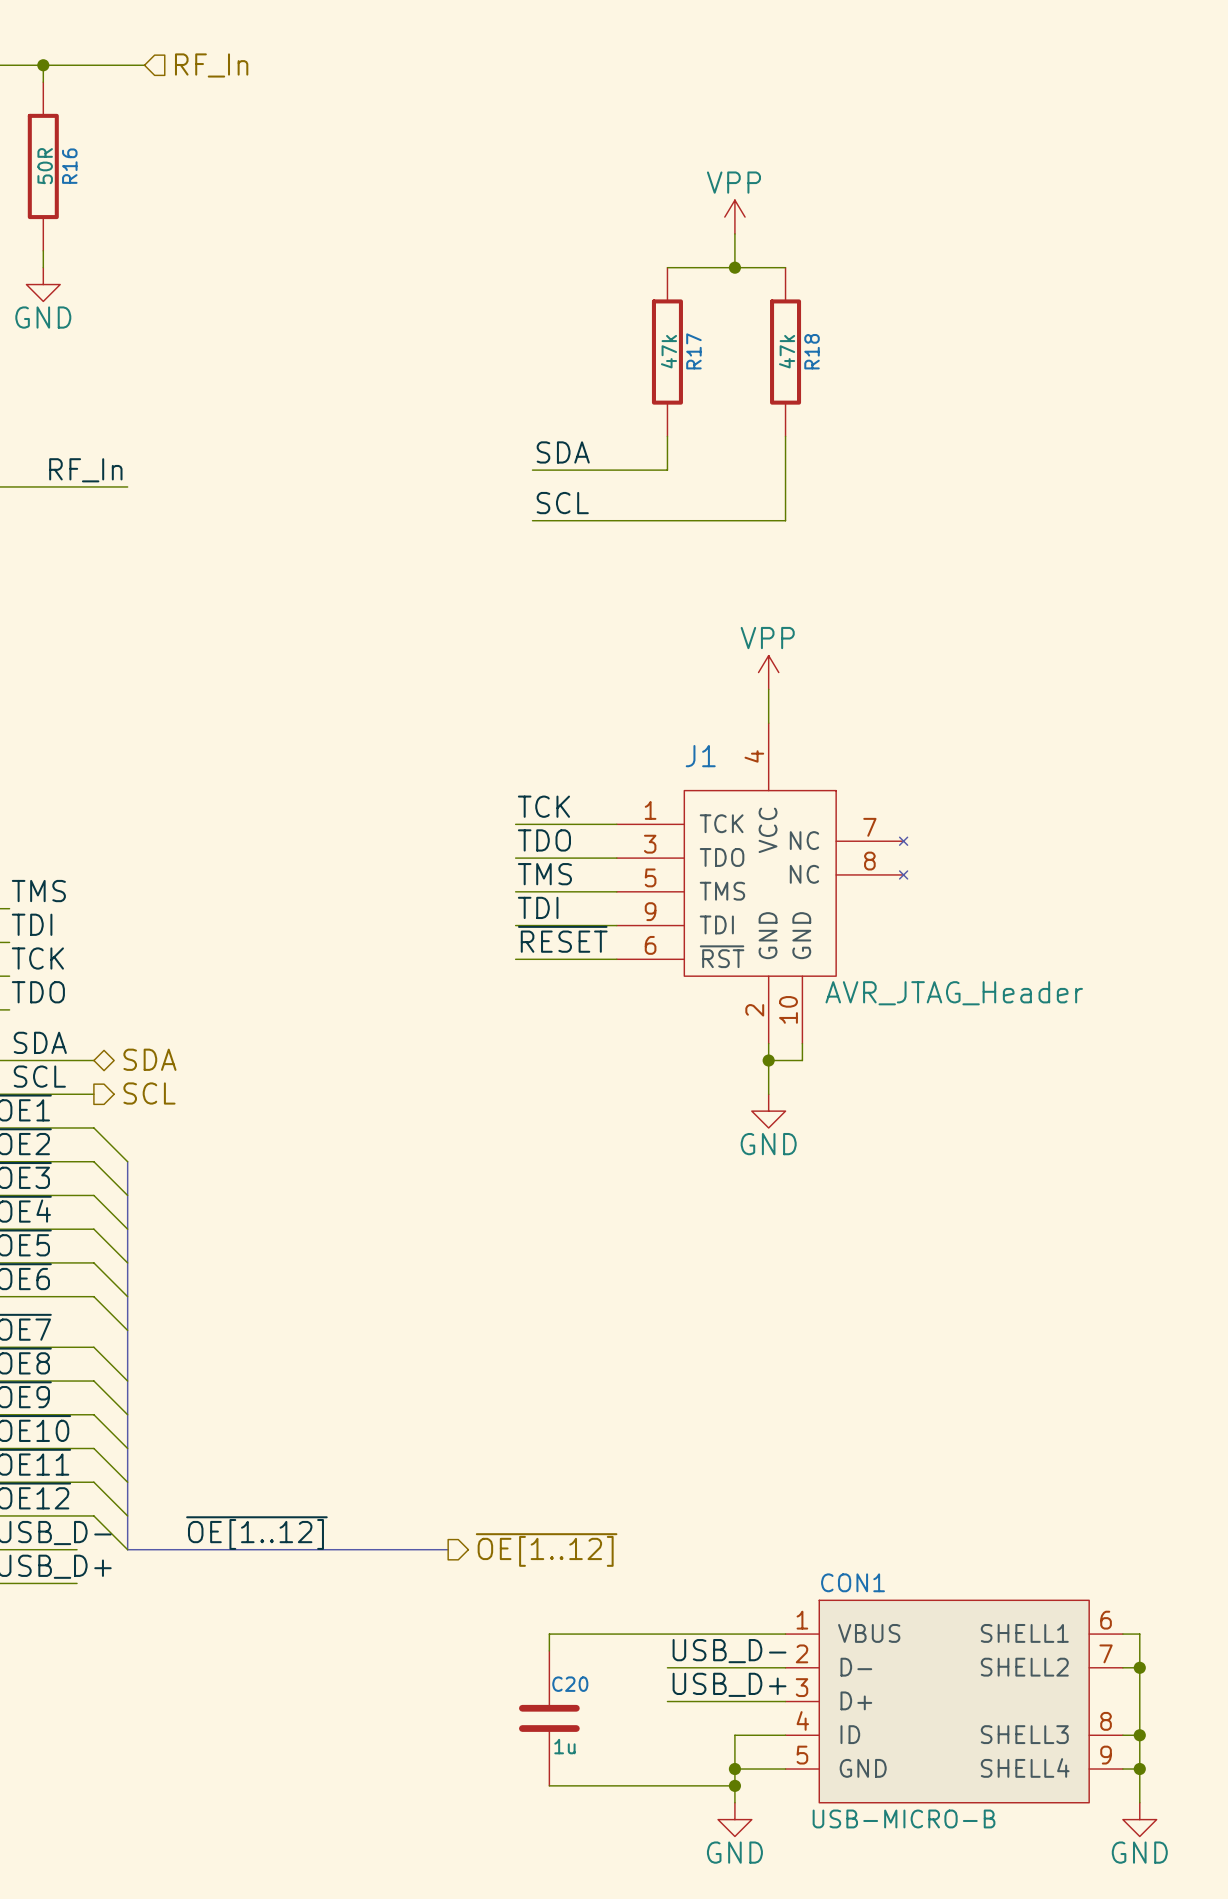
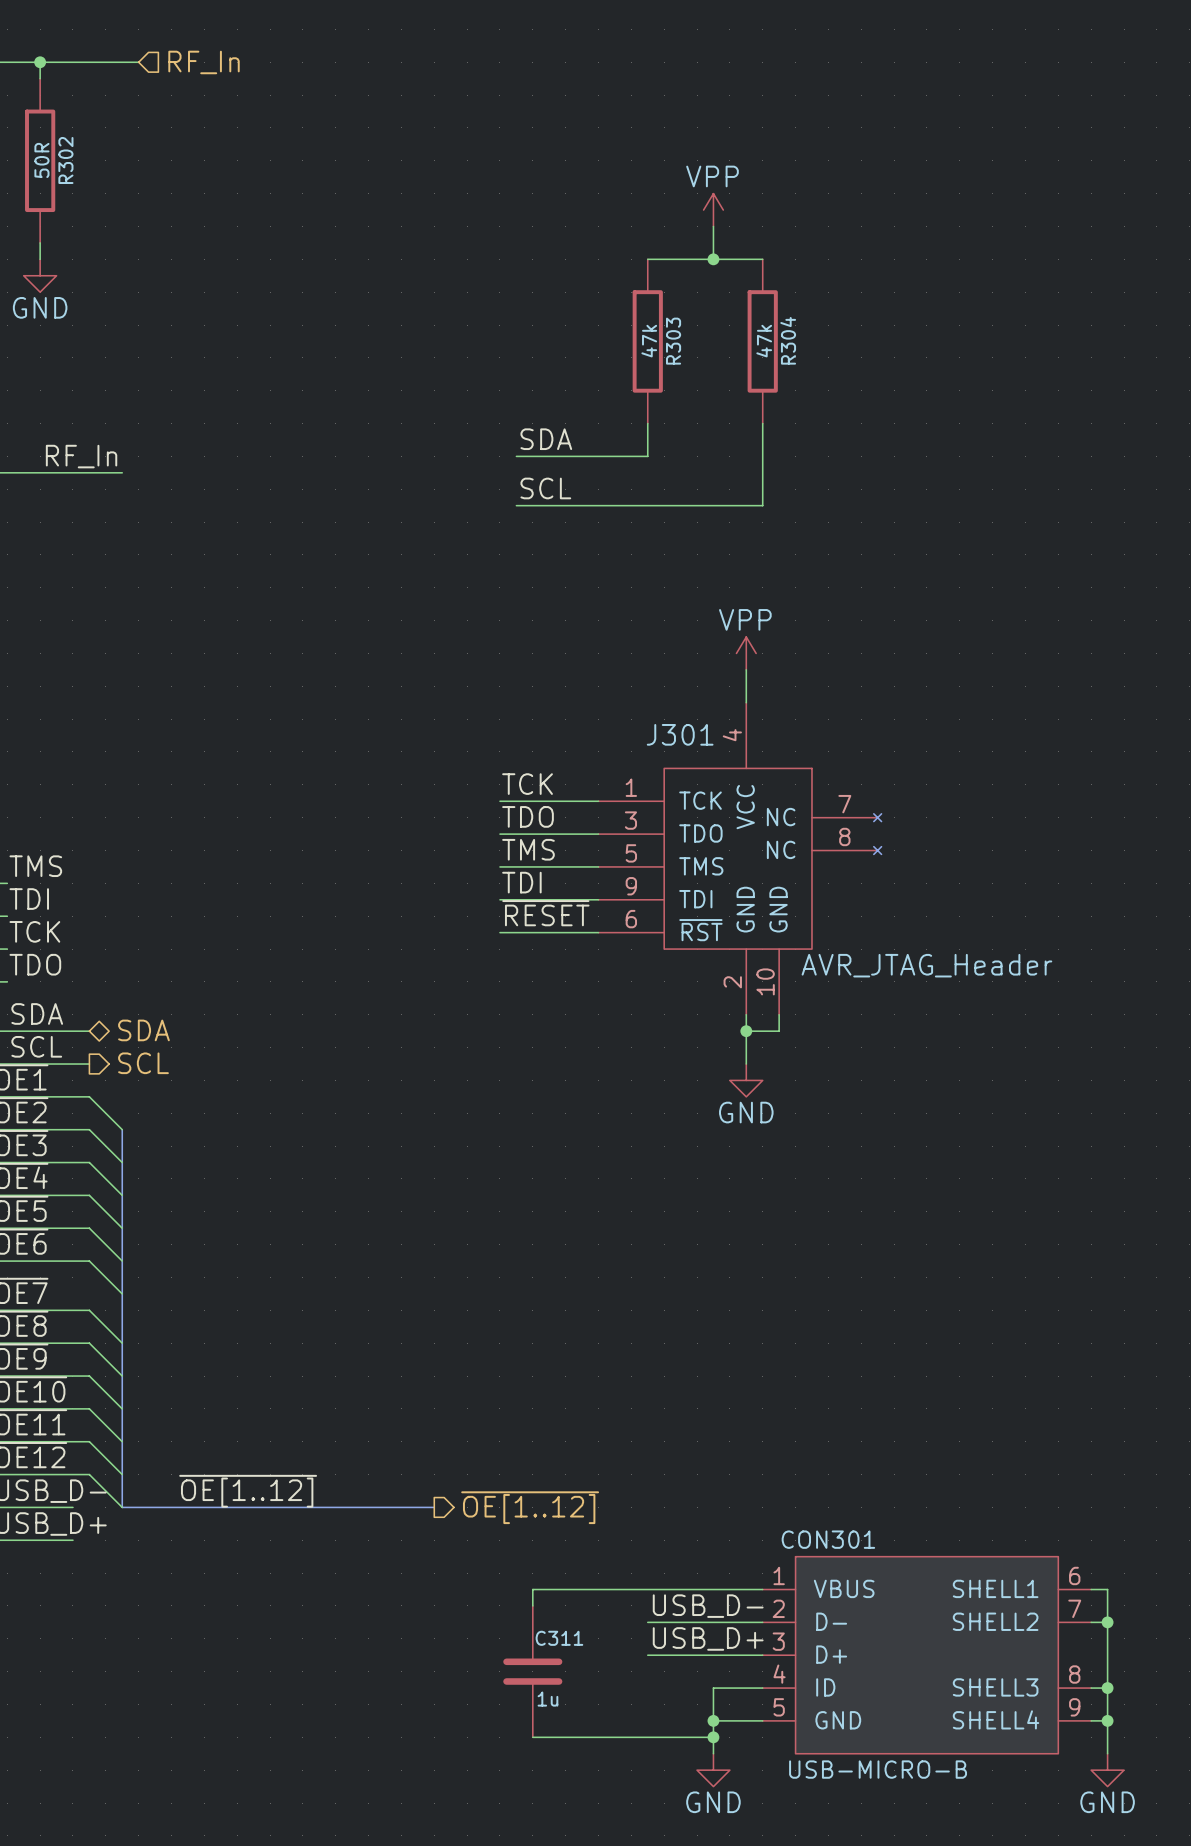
R16 name: R16 (69, 166) -> R302 (65, 160)
R17 name: R17 (693, 351) -> R303 (673, 341)
R18 name: R18 (812, 351) -> R304 (788, 340)
J1 name: J1 (700, 756) -> J301 (680, 734)
CON1 name: CON1 (853, 1582) -> CON301 (828, 1539)
C20 name: C20 (570, 1684) -> C311 (559, 1638)

